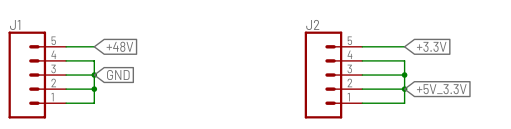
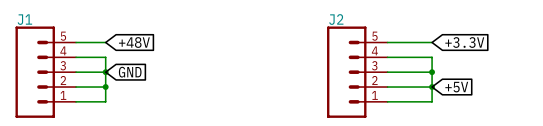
global label: +5V_3.3V (441, 89) -> +5V (456, 87)

